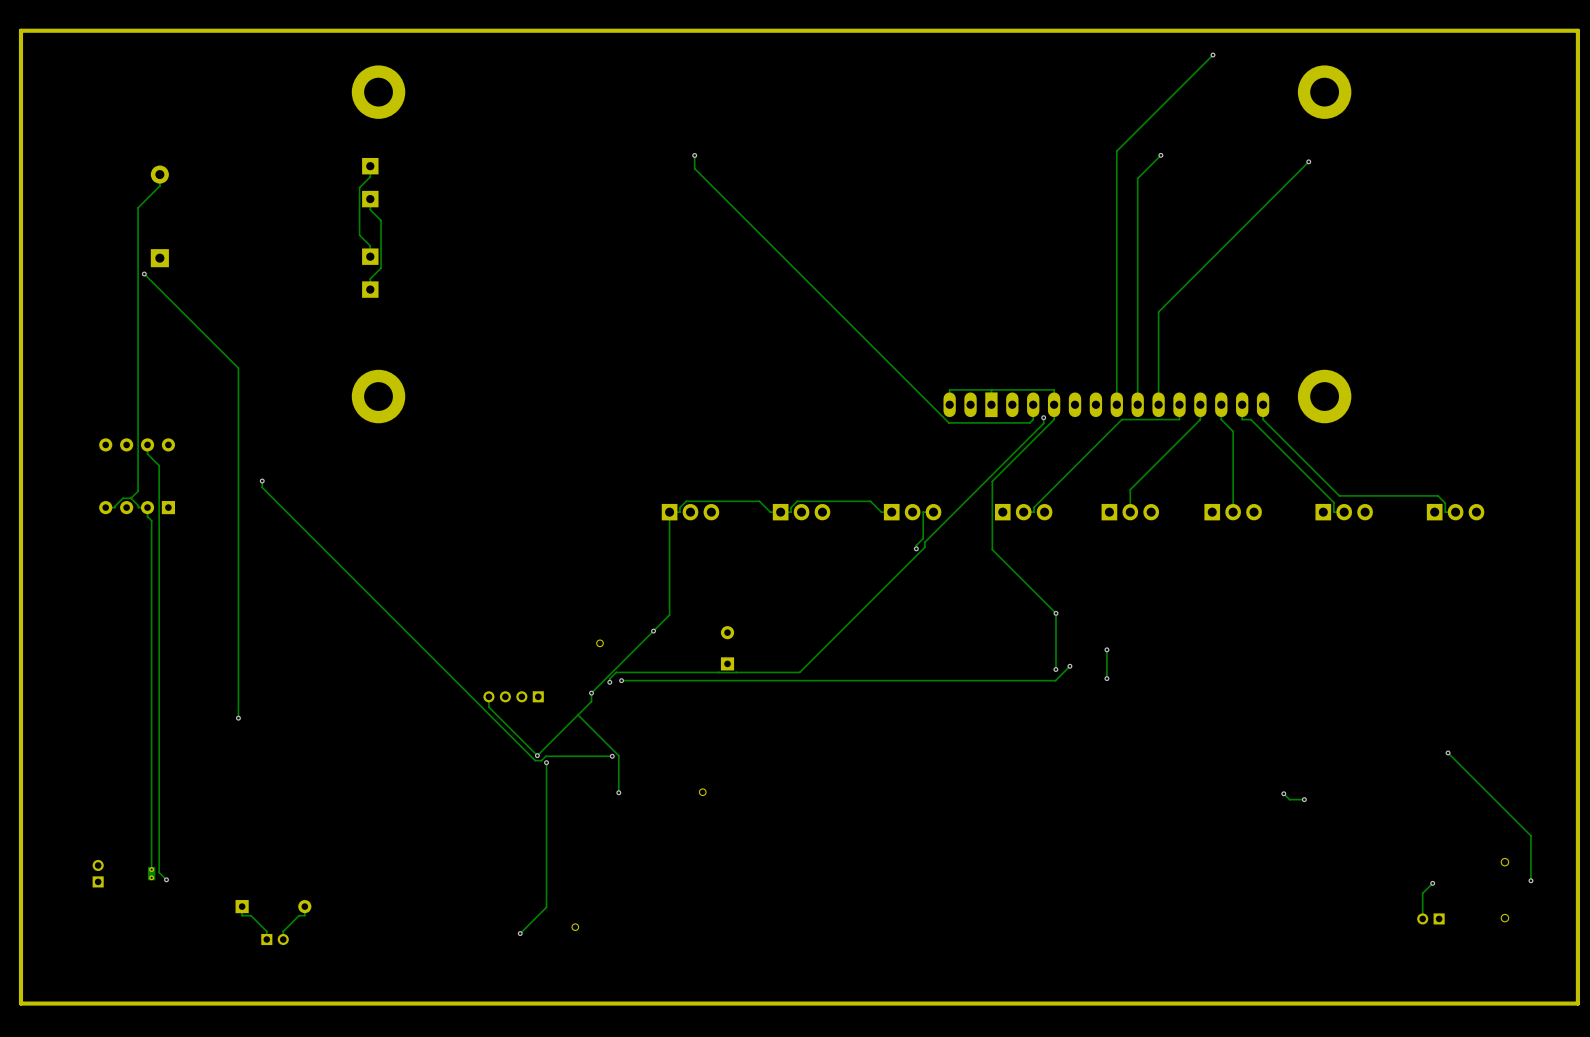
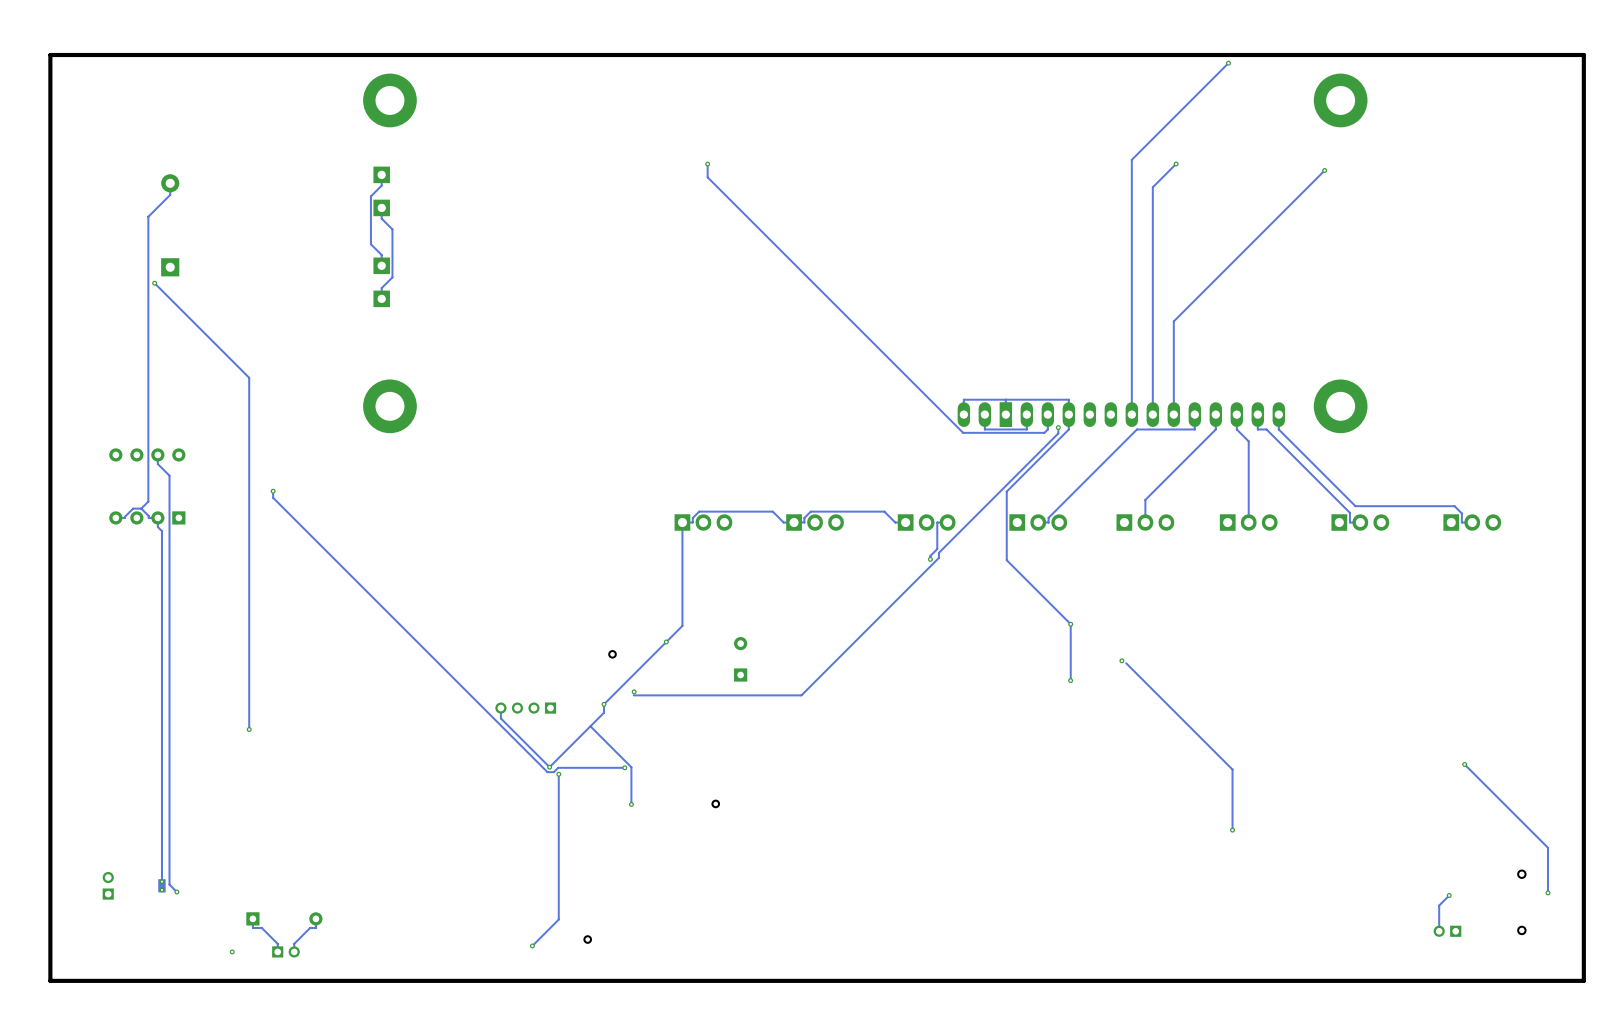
board edge: (1577, 30) (20, 30) (20, 1003) (1577, 1003) (1577, 30) -> (1583, 54) (1583, 980) (50, 980) (50, 54) (1583, 54)
track: none -> (1026, 414) (1026, 429) (984, 429) (984, 414)
track: (1106, 649) (1106, 678) -> none
track: none -> (1126, 663) (1232, 769) (1232, 830)
track: (1069, 666) (1055, 680) (621, 680) -> none
via: (1069, 666) -> none
track: (718, 672) (616, 672) (609, 678) (609, 682) -> none
track: (736, 672) (718, 672) -> none
track: (799, 672) (736, 672) -> (813, 683) (801, 695) (633, 695)
via: (1106, 678) -> none
via: (609, 682) -> none
track: (1283, 793) (1289, 799) (1304, 799) -> none
via: (1283, 793) -> none
via: (1304, 799) -> none
via: none -> (1232, 830)
via: none -> (232, 951)

